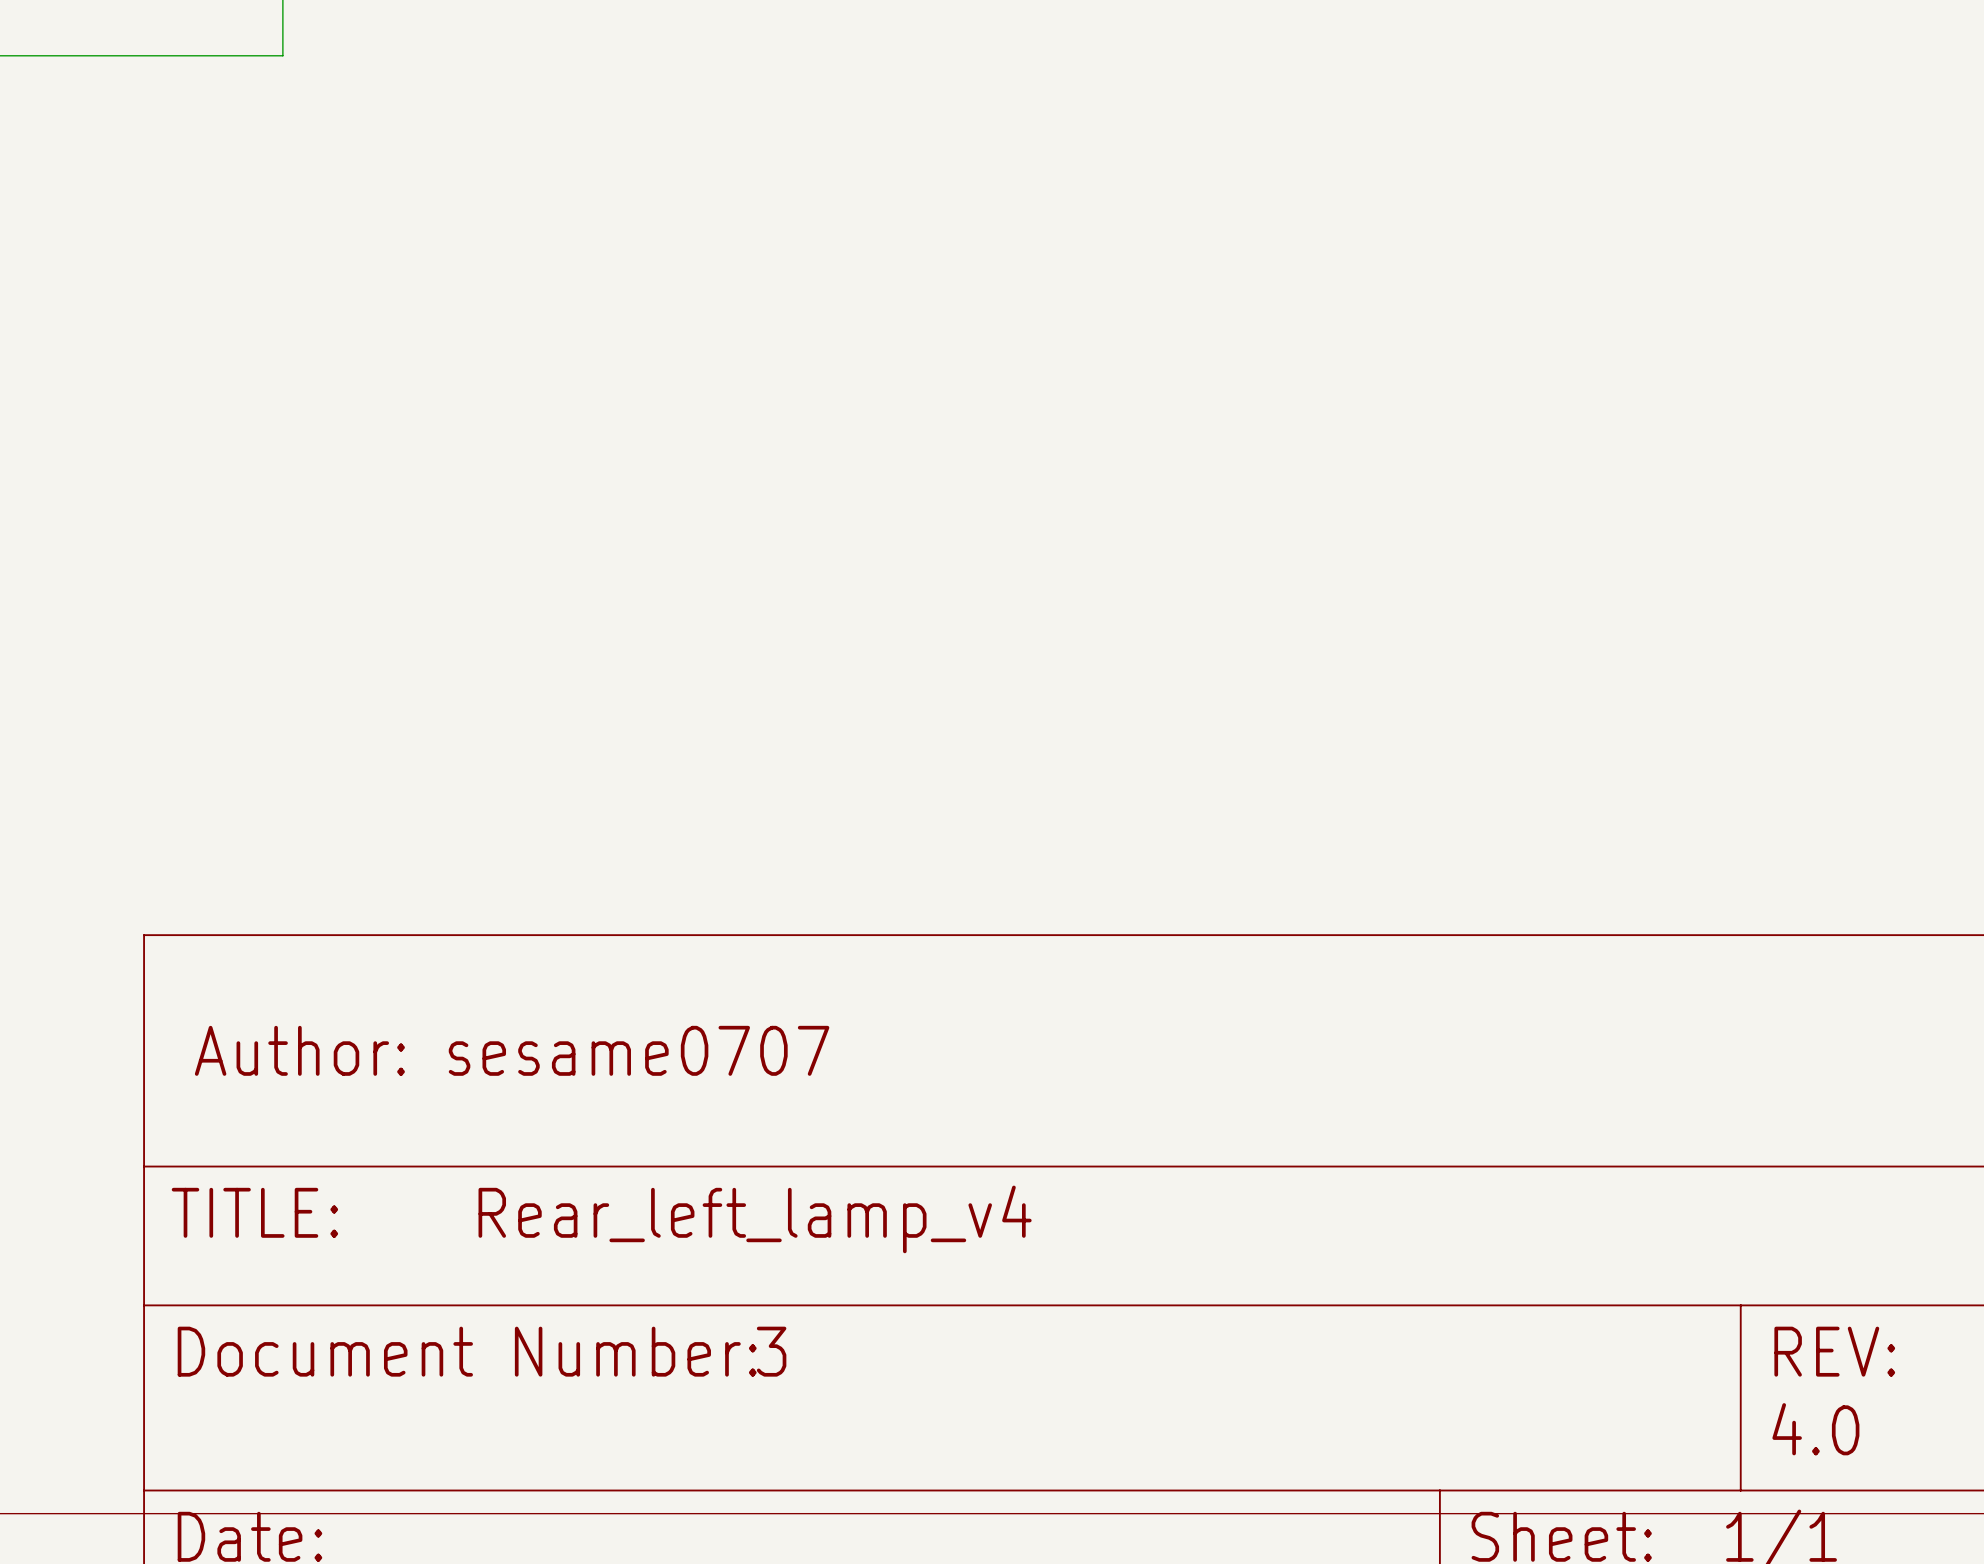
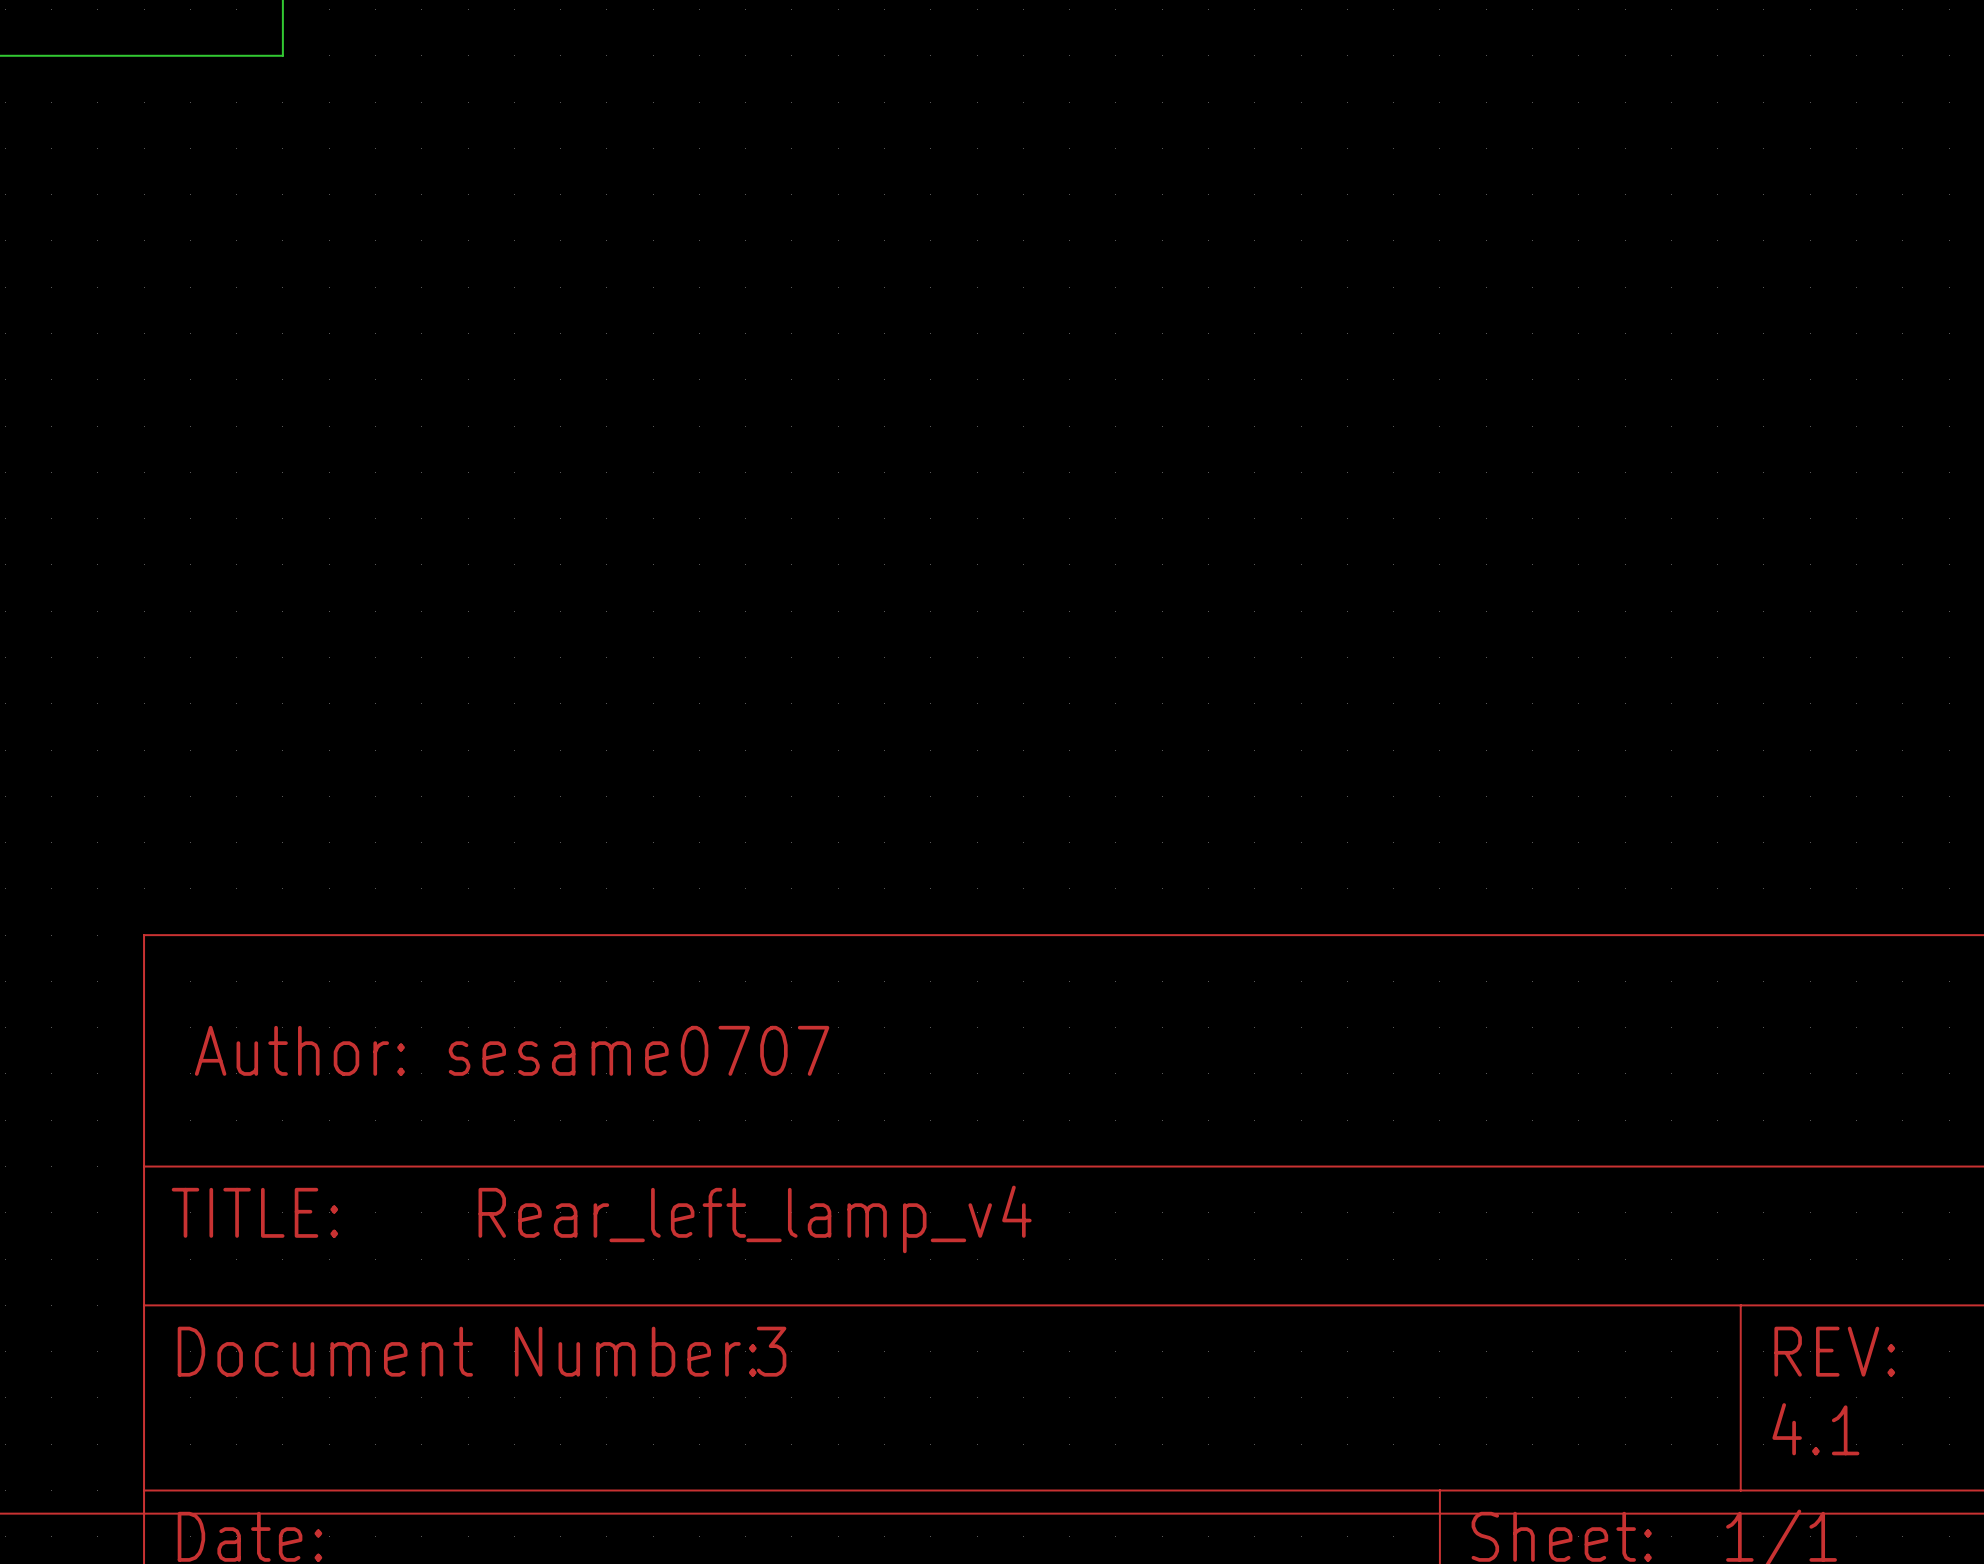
text: 4.0 (1815, 1429) -> 4.1 (1815, 1429)

